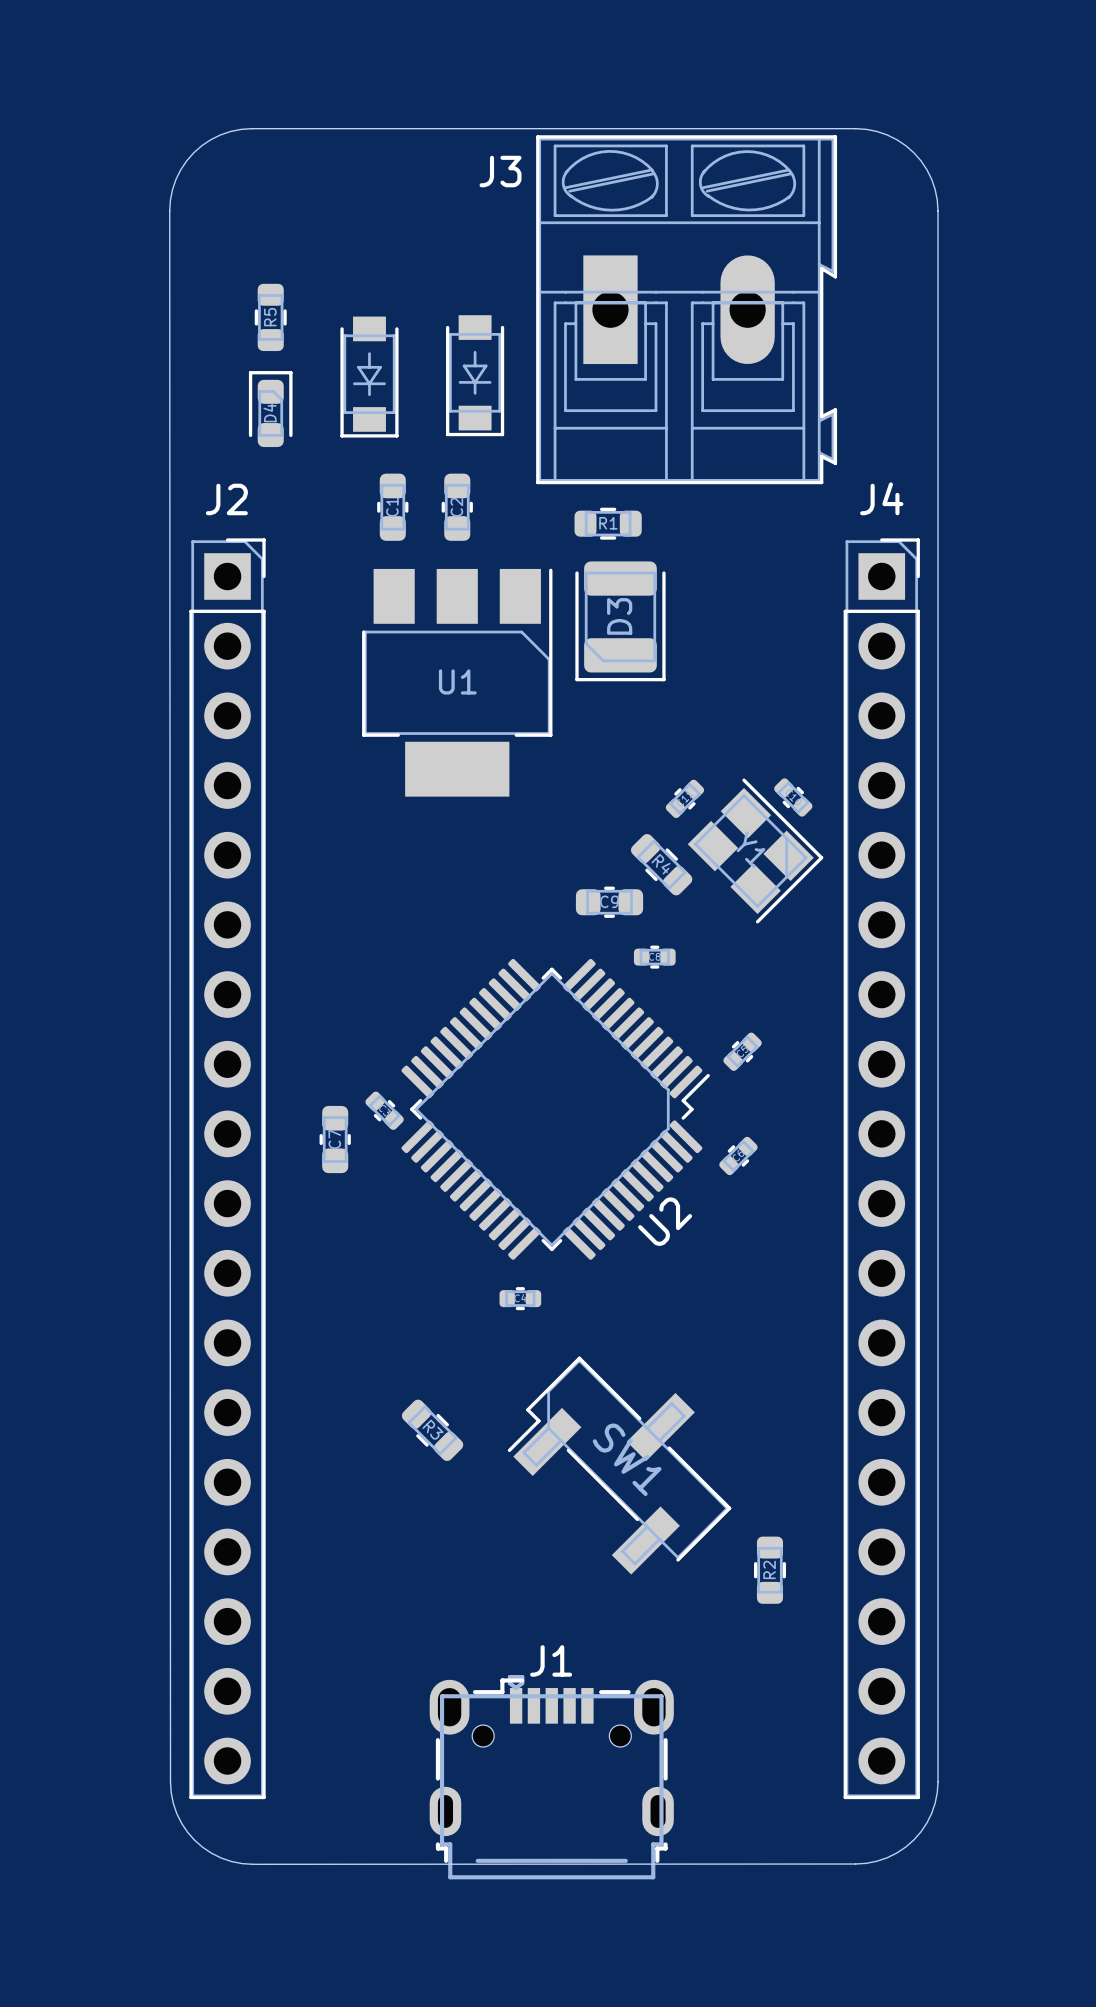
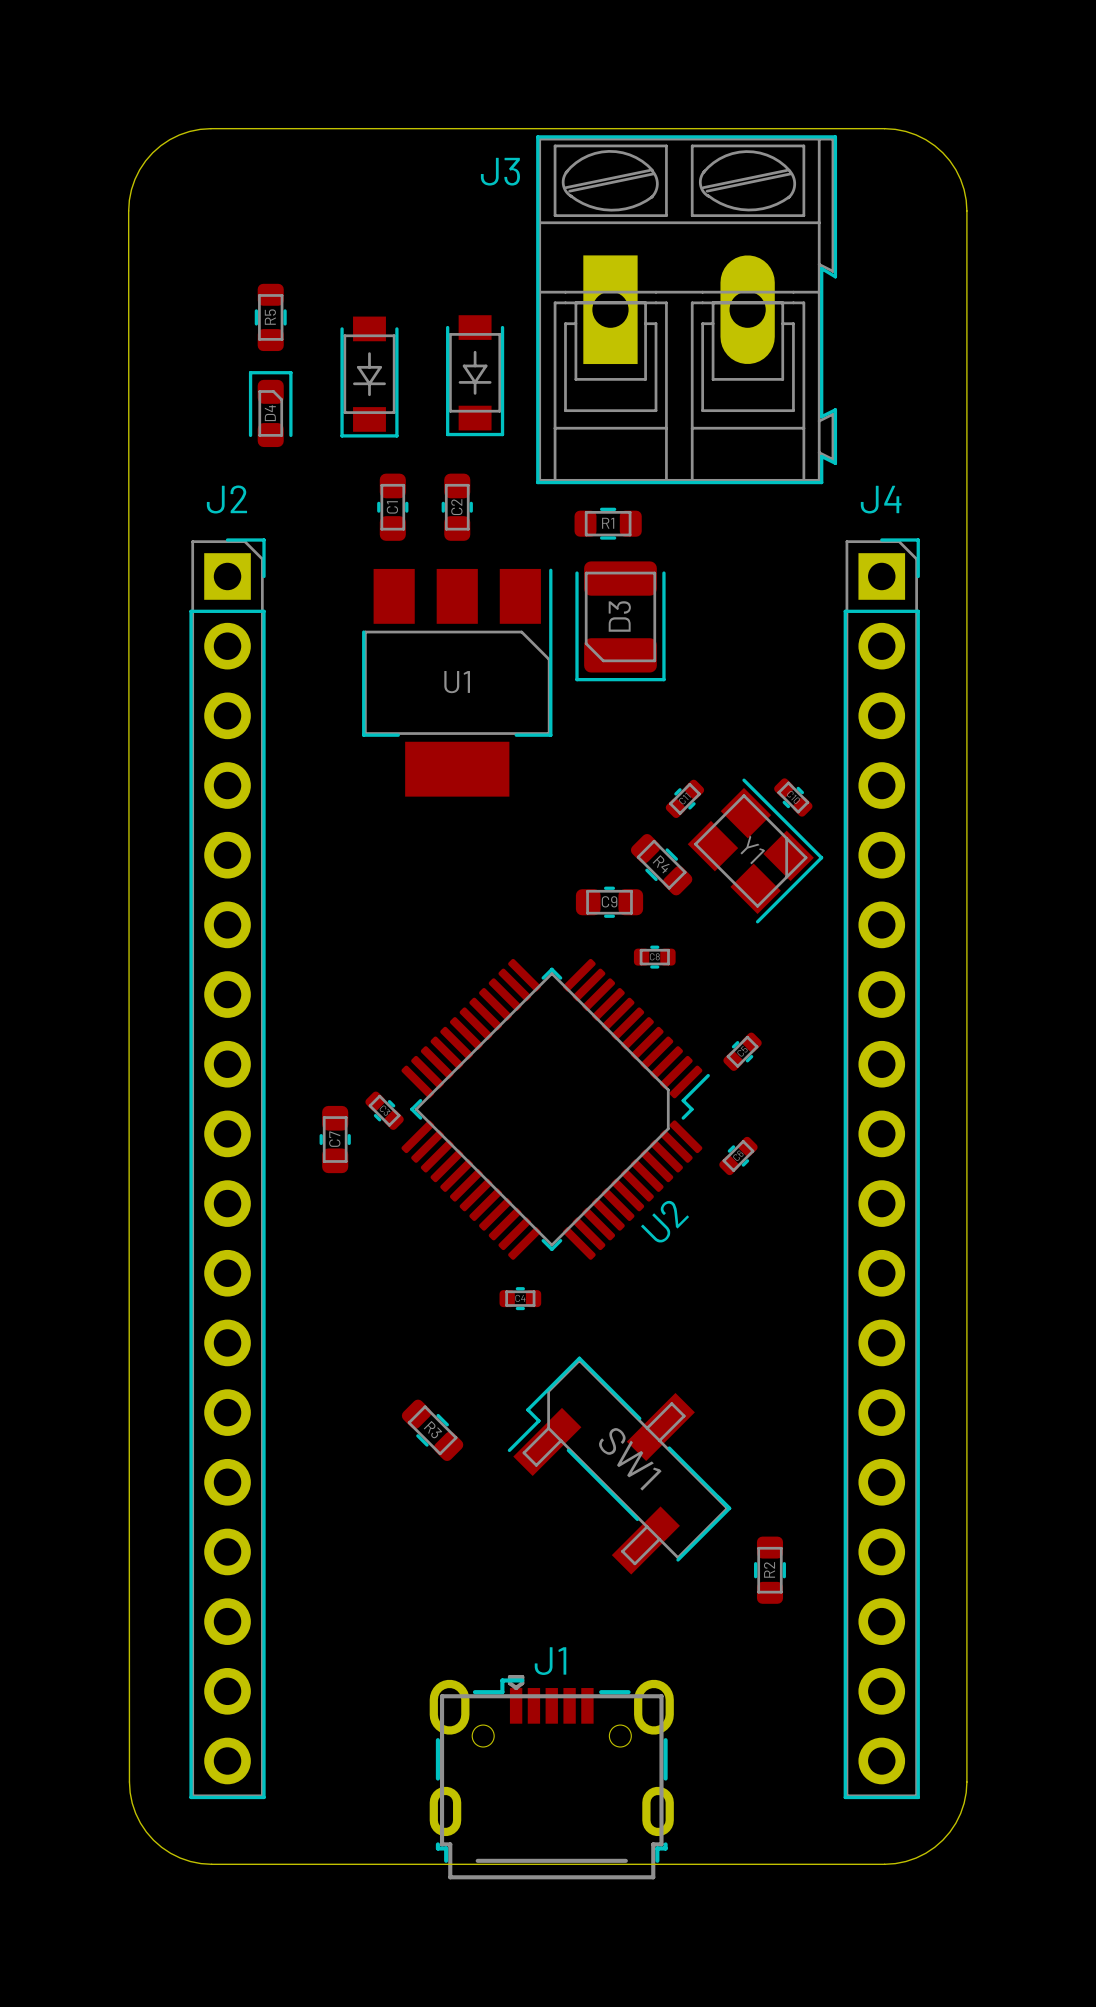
board edge: (252, 128) (220, 134) (193, 152) (175, 179) (169, 210) (170, 1782) (173, 1803) (187, 1832) (211, 1853) (242, 1863) (866, 1863) (887, 1857) (905, 1847) (921, 1831) (931, 1813) (938, 1781) (938, 210) -> (252, 128) (200, 129) (169, 139) (152, 152) (139, 169) (131, 189) (128, 210) (129, 1782) (135, 1813) (153, 1840) (180, 1858) (211, 1864) (895, 1863) (916, 1858) (934, 1847) (949, 1832) (960, 1813) (966, 1782) (966, 210) (964, 189) (955, 169) (934, 145) (905, 131) (884, 128) (855, 128)
board edge: (855, 128) (887, 134) (913, 152) (931, 179) (938, 210) -> none

